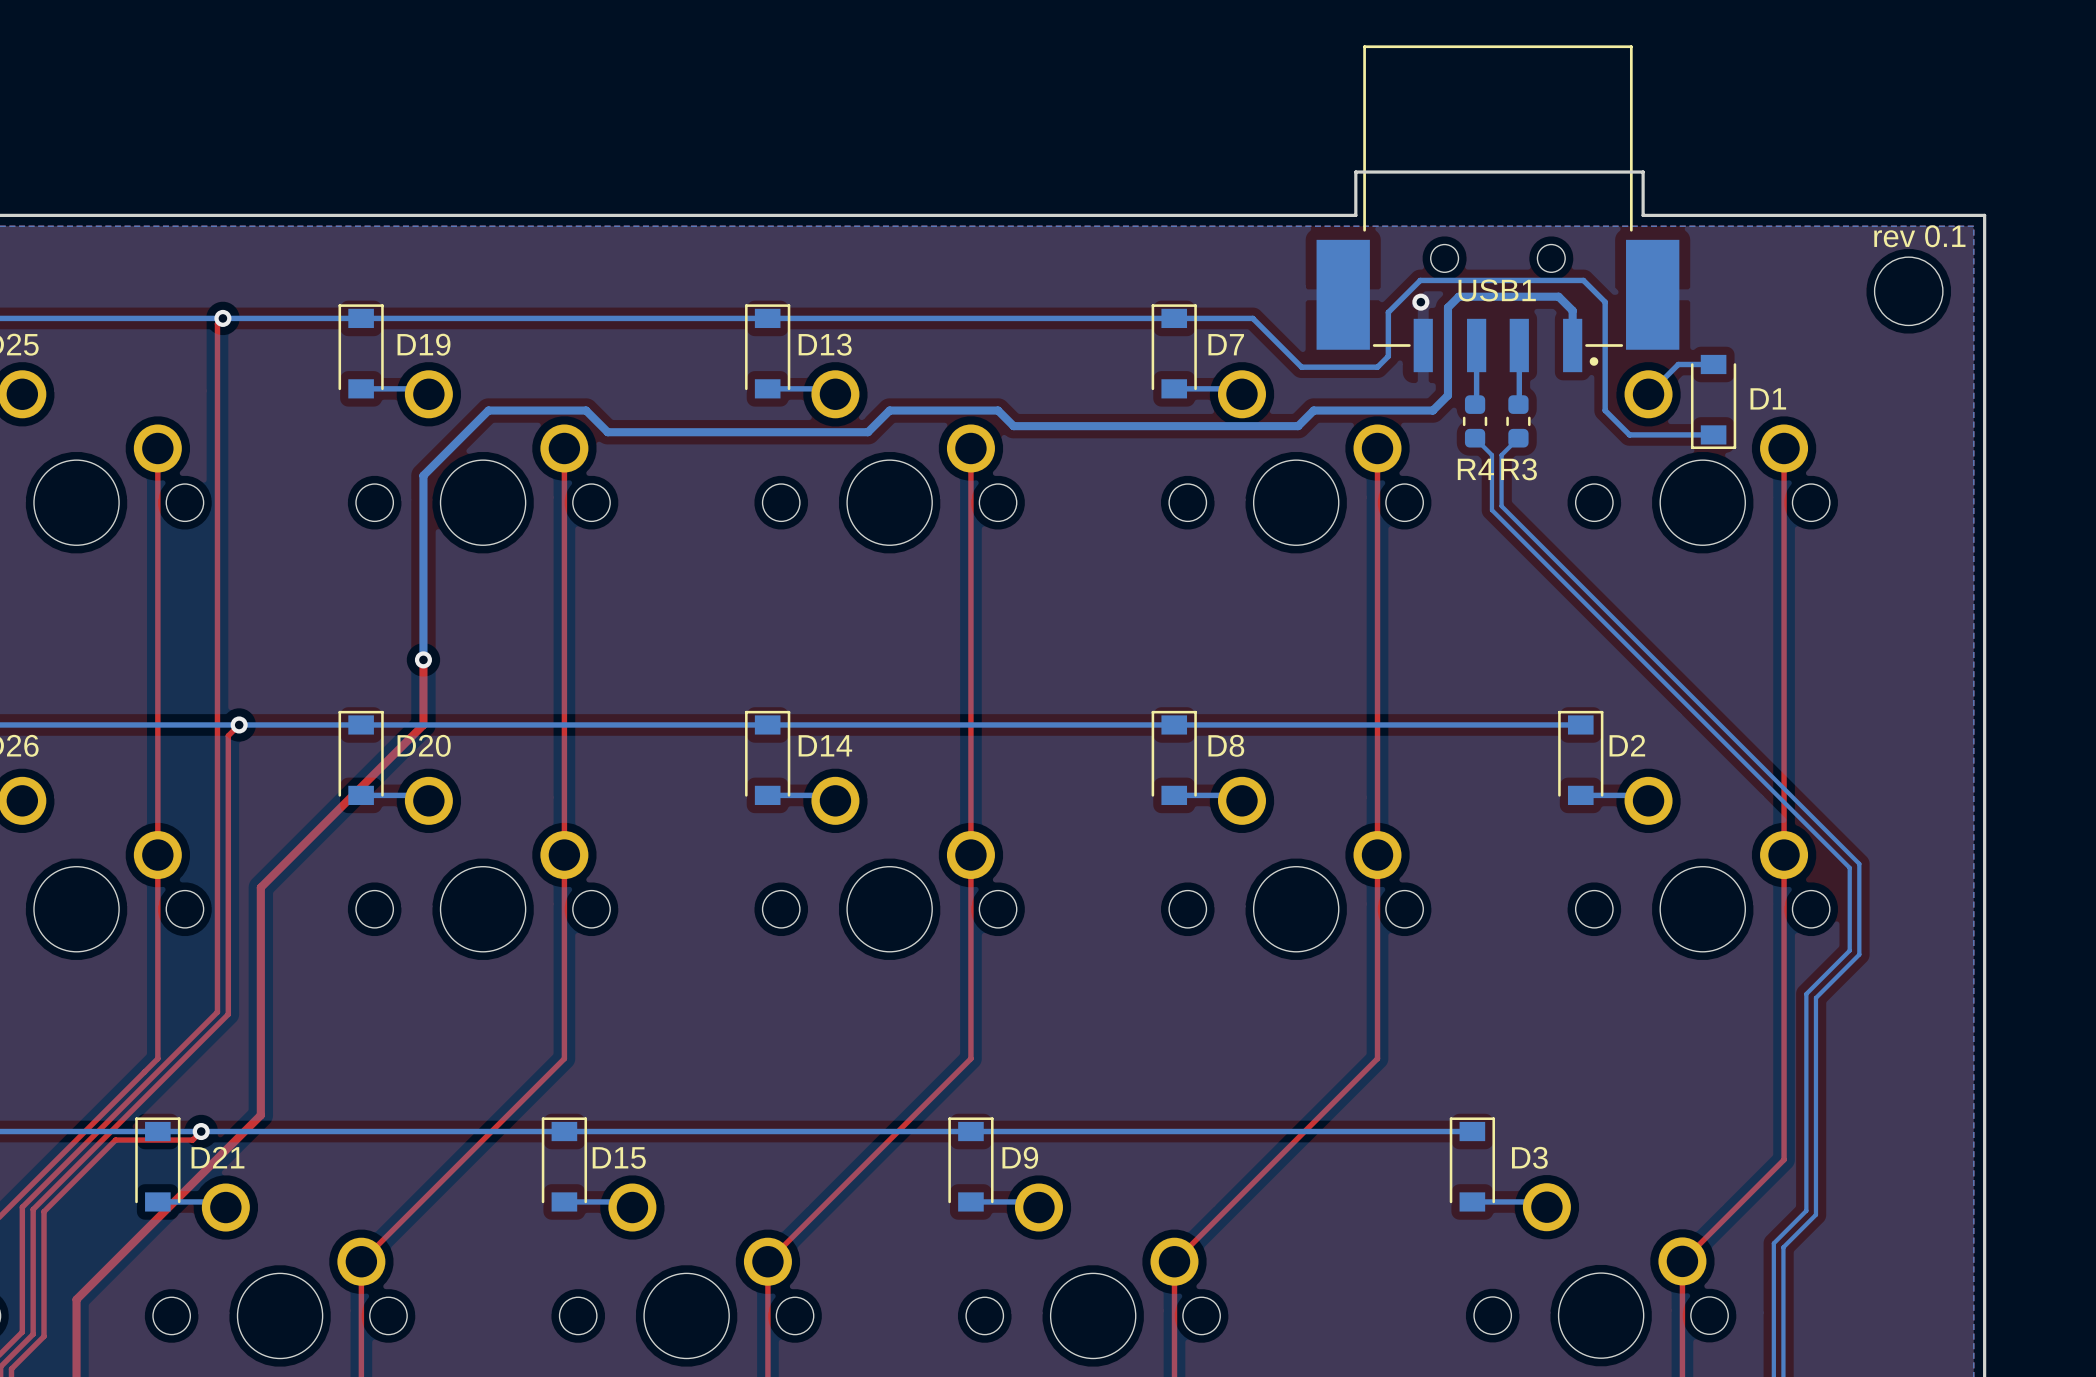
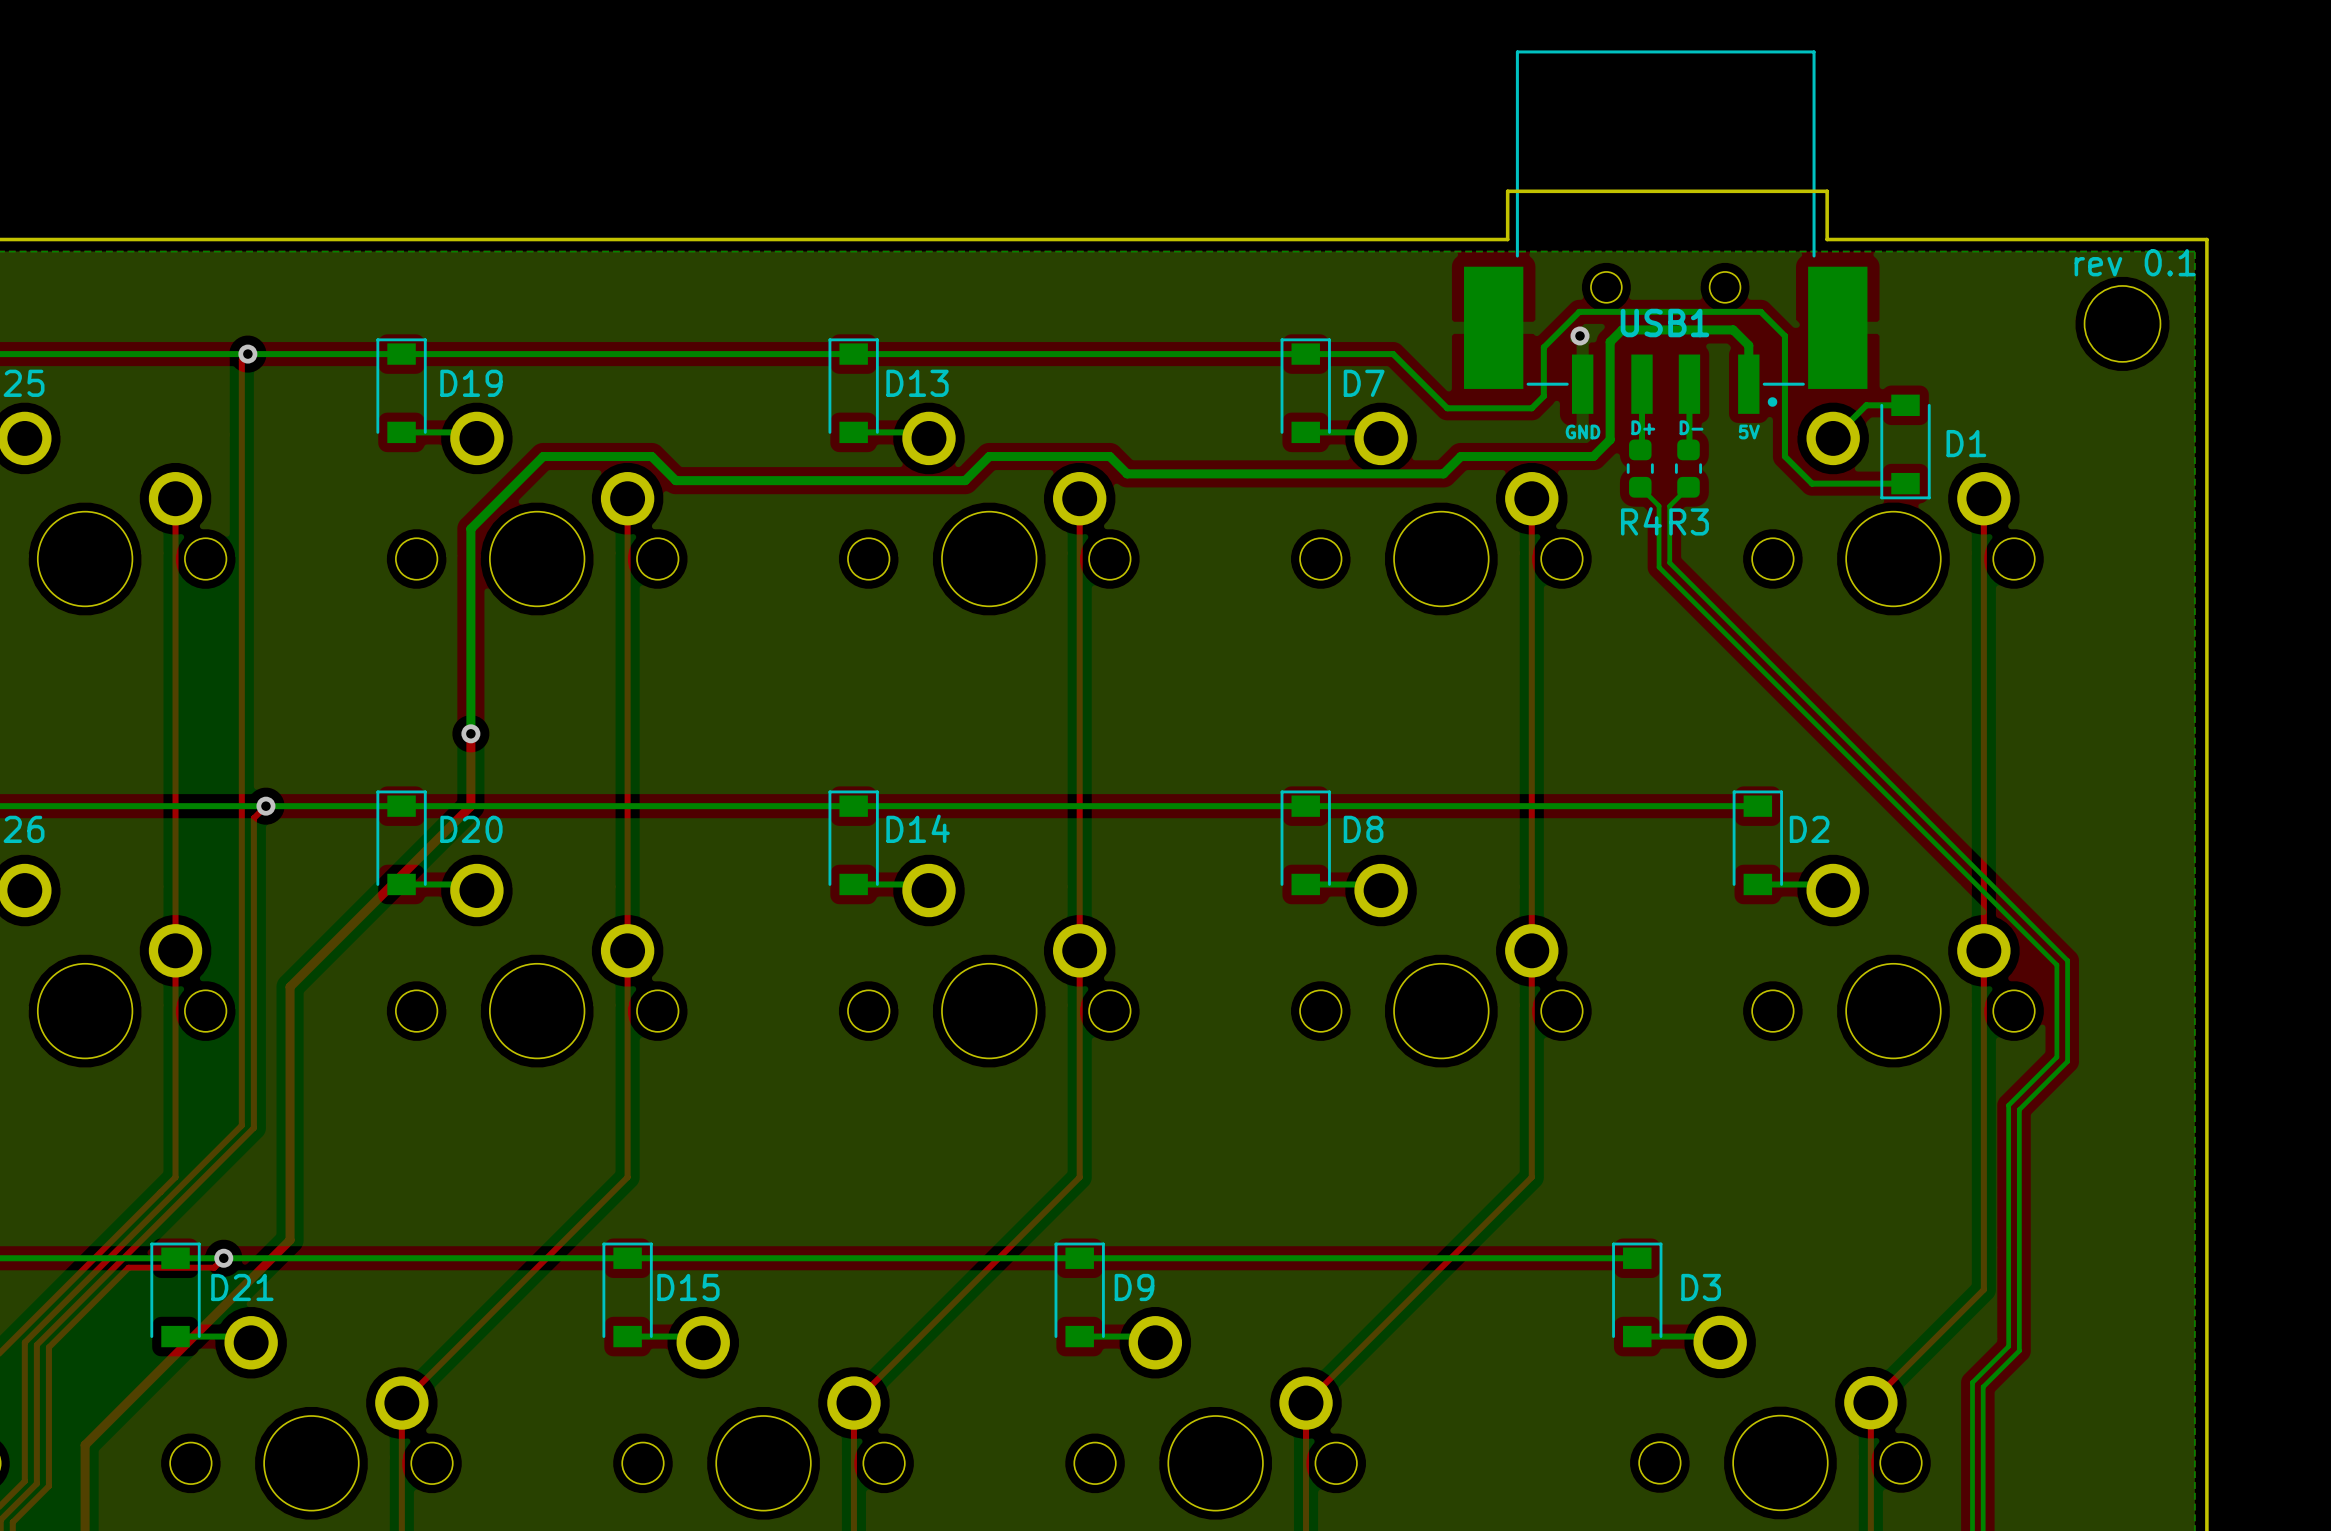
text: none -> D+ (1643, 427)
text: none -> D- (1691, 427)
text: none -> GND (1583, 431)
text: none -> 5V (1749, 431)

